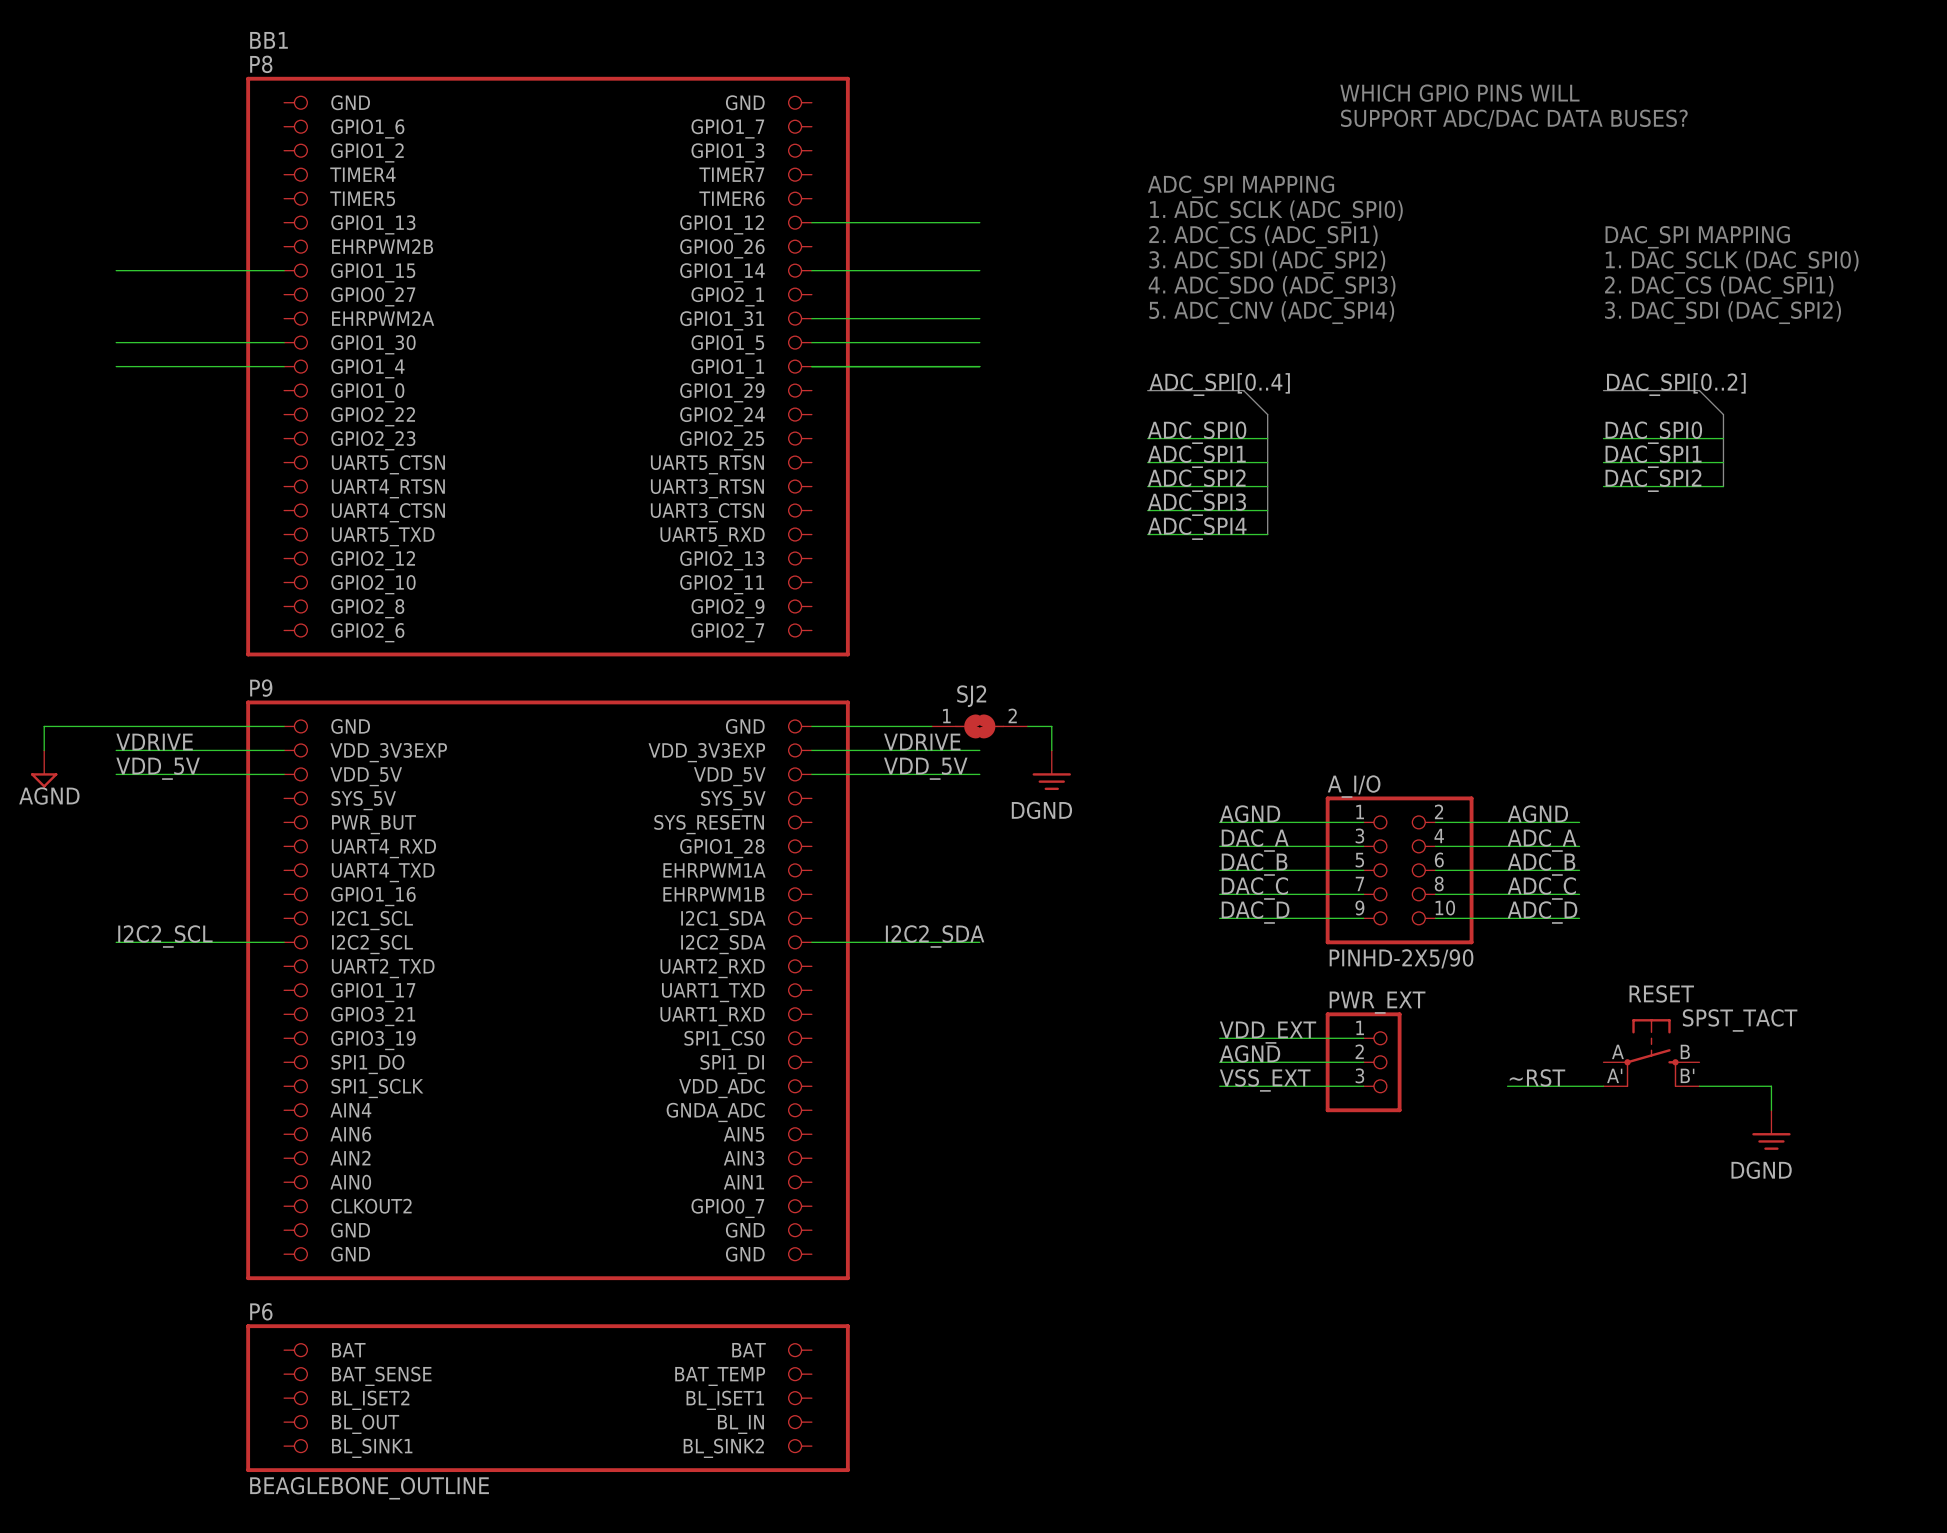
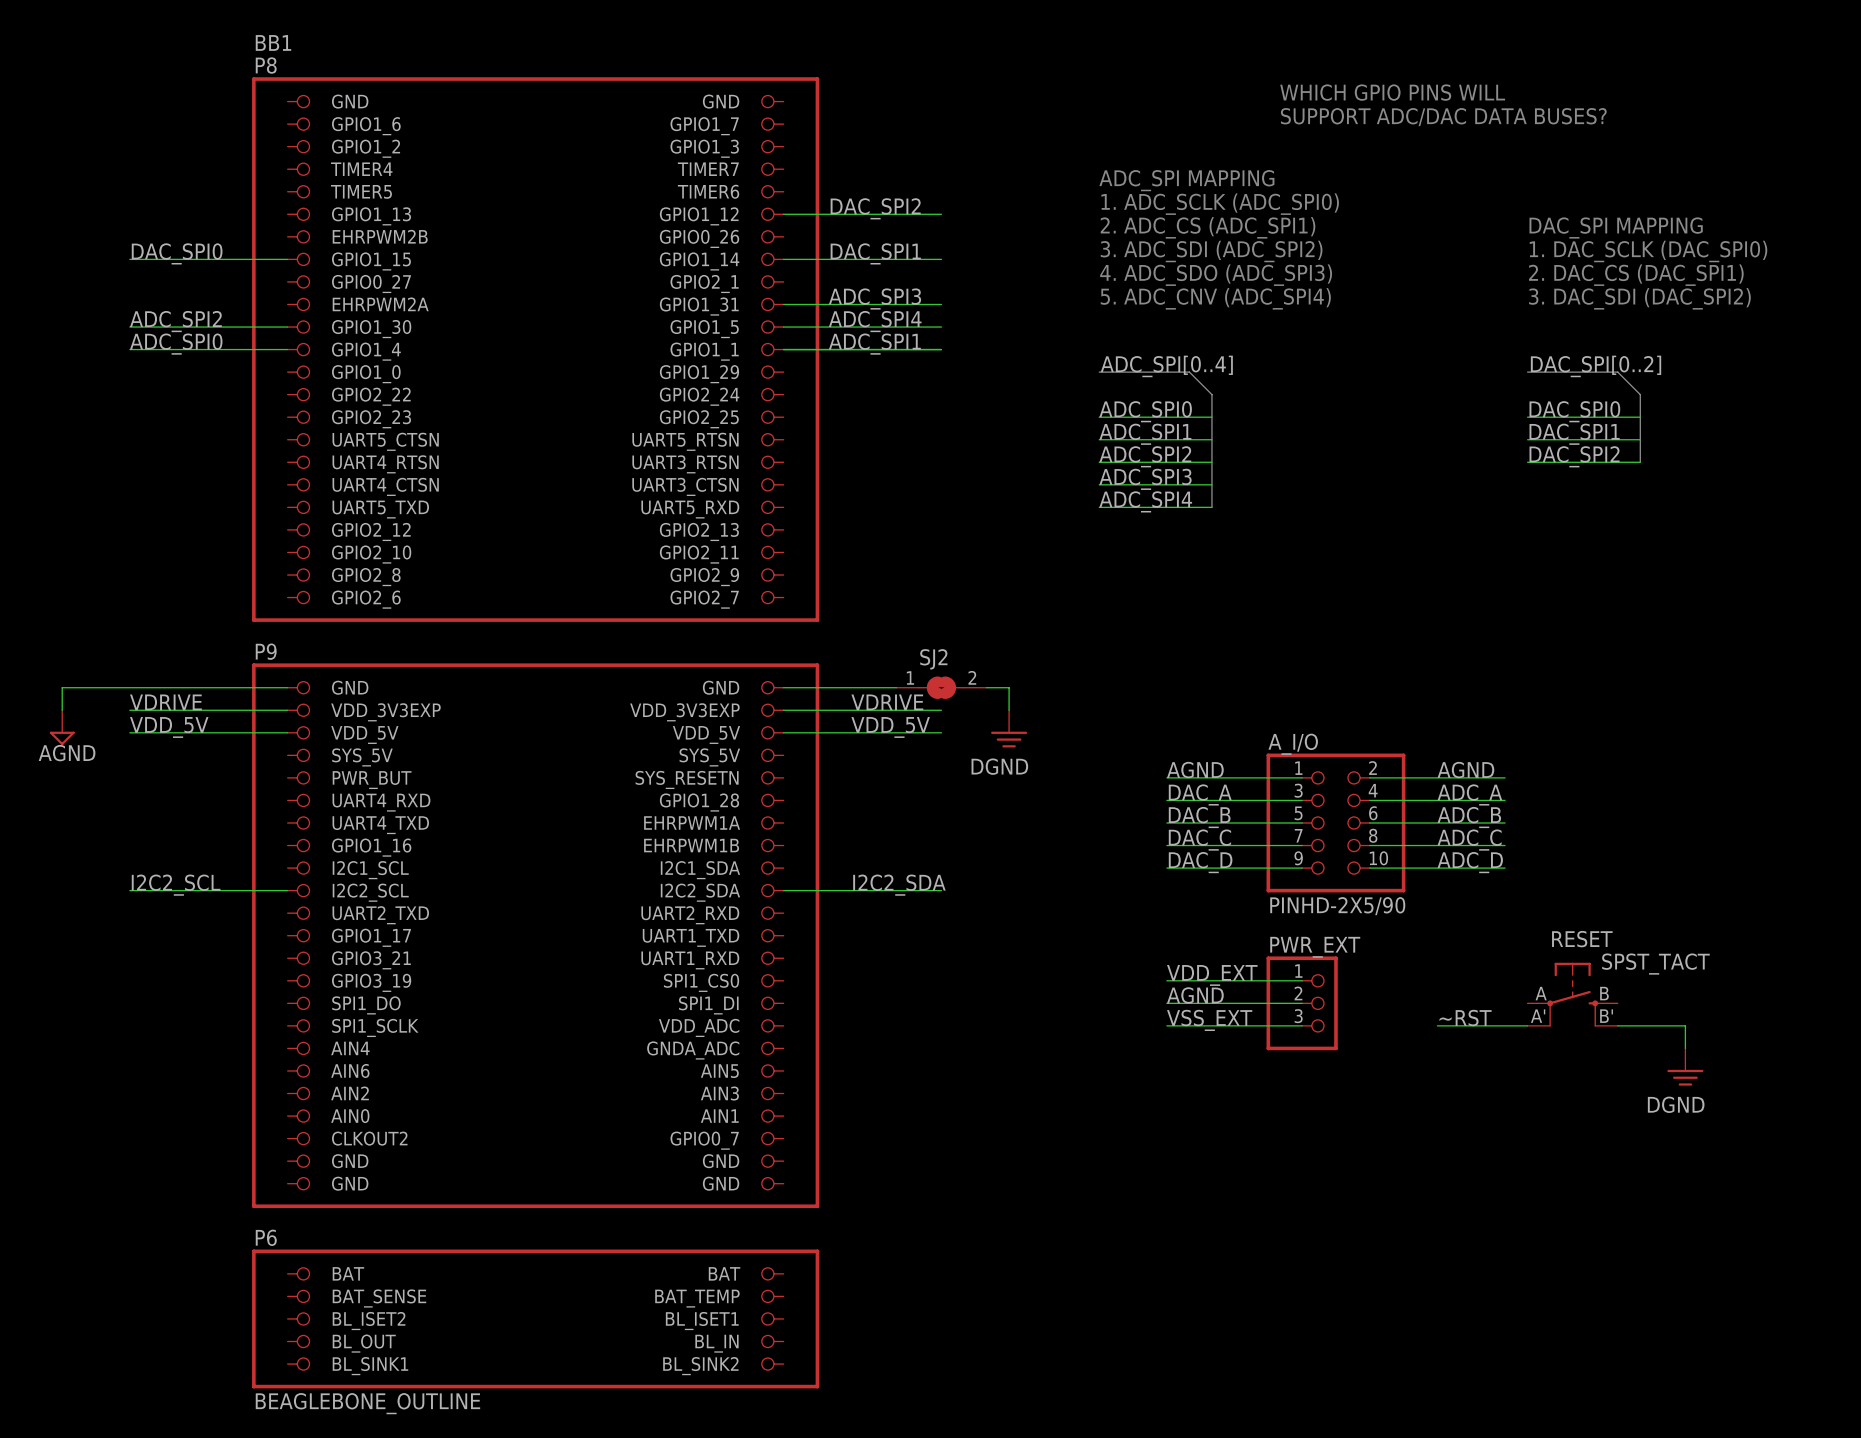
label: none -> DAC_SPI2 (875, 208)
label: none -> DAC_SPI0 (177, 253)
label: none -> DAC_SPI1 (875, 253)
label: none -> ADC_SPI3 (874, 298)
label: none -> ADC_SPI2 (175, 321)
label: none -> ADC_SPI4 (875, 321)
label: none -> ADC_SPI0 (176, 344)
label: none -> ADC_SPI1 (874, 344)

